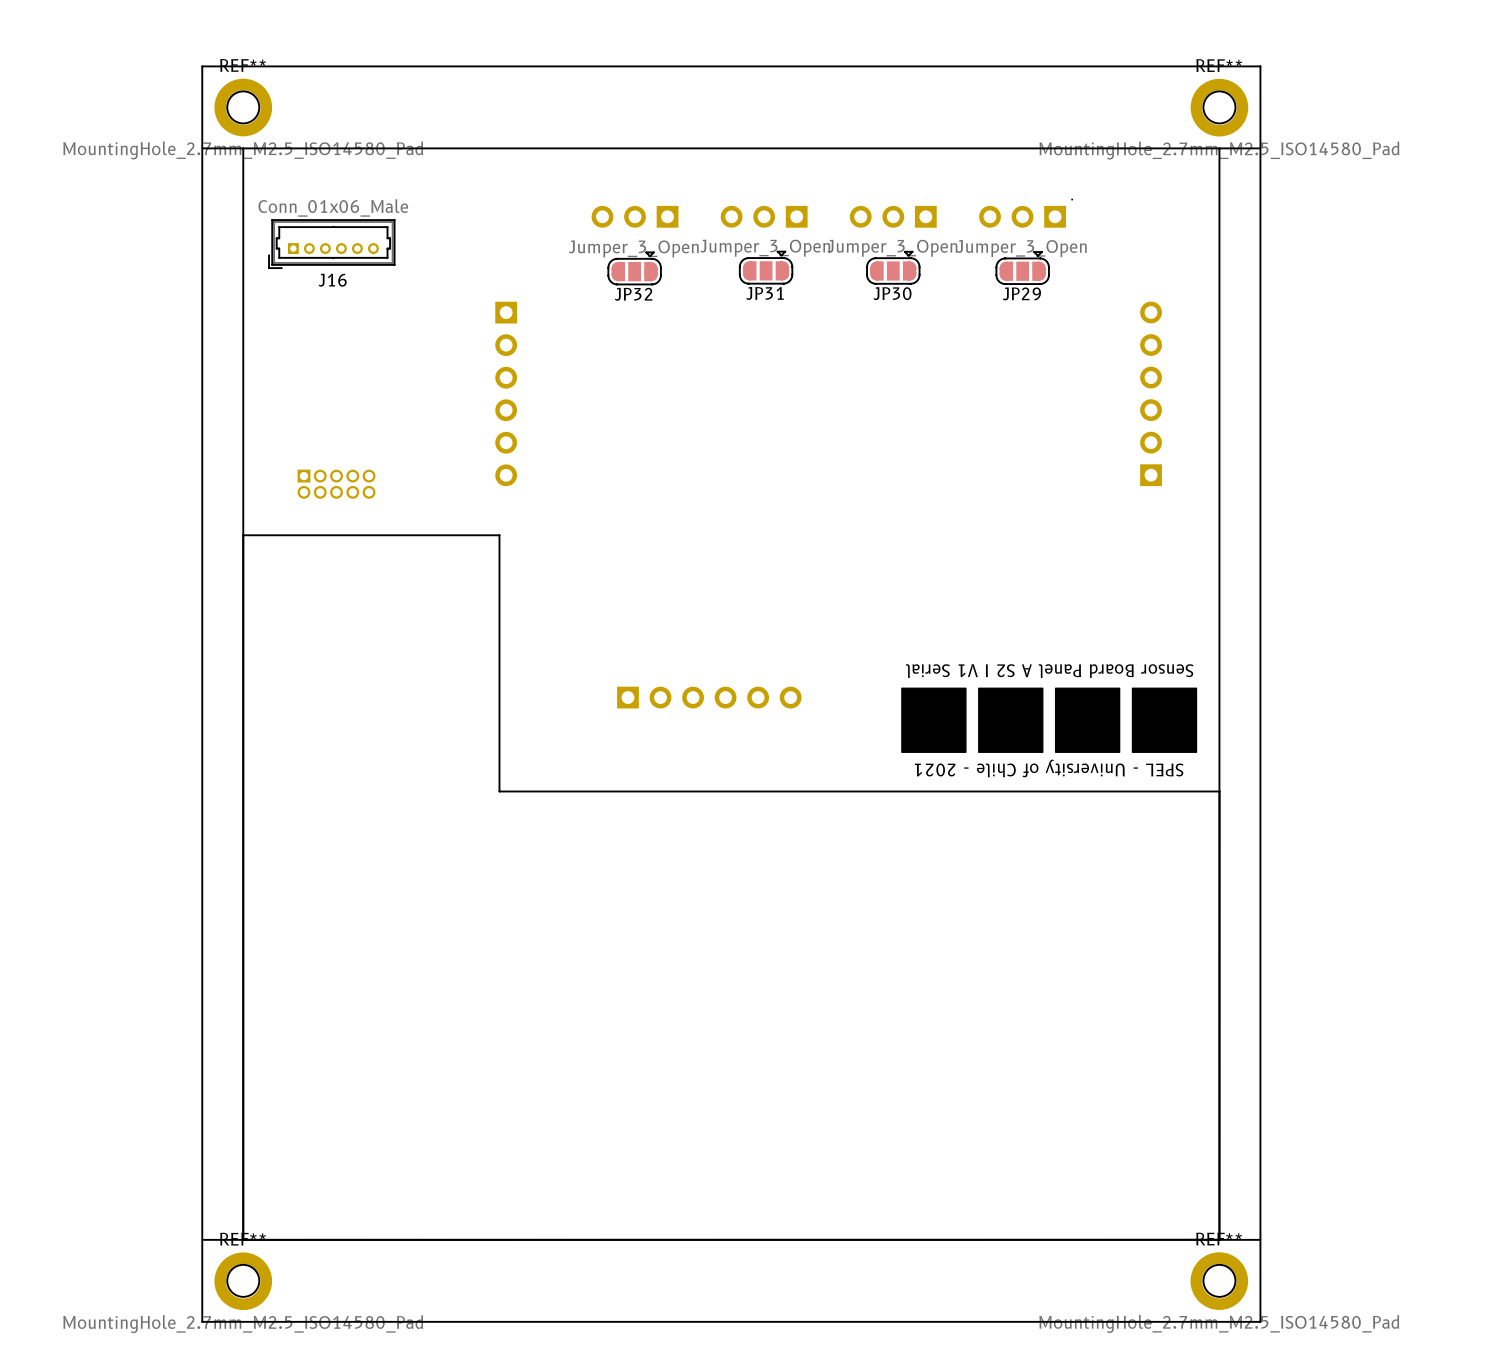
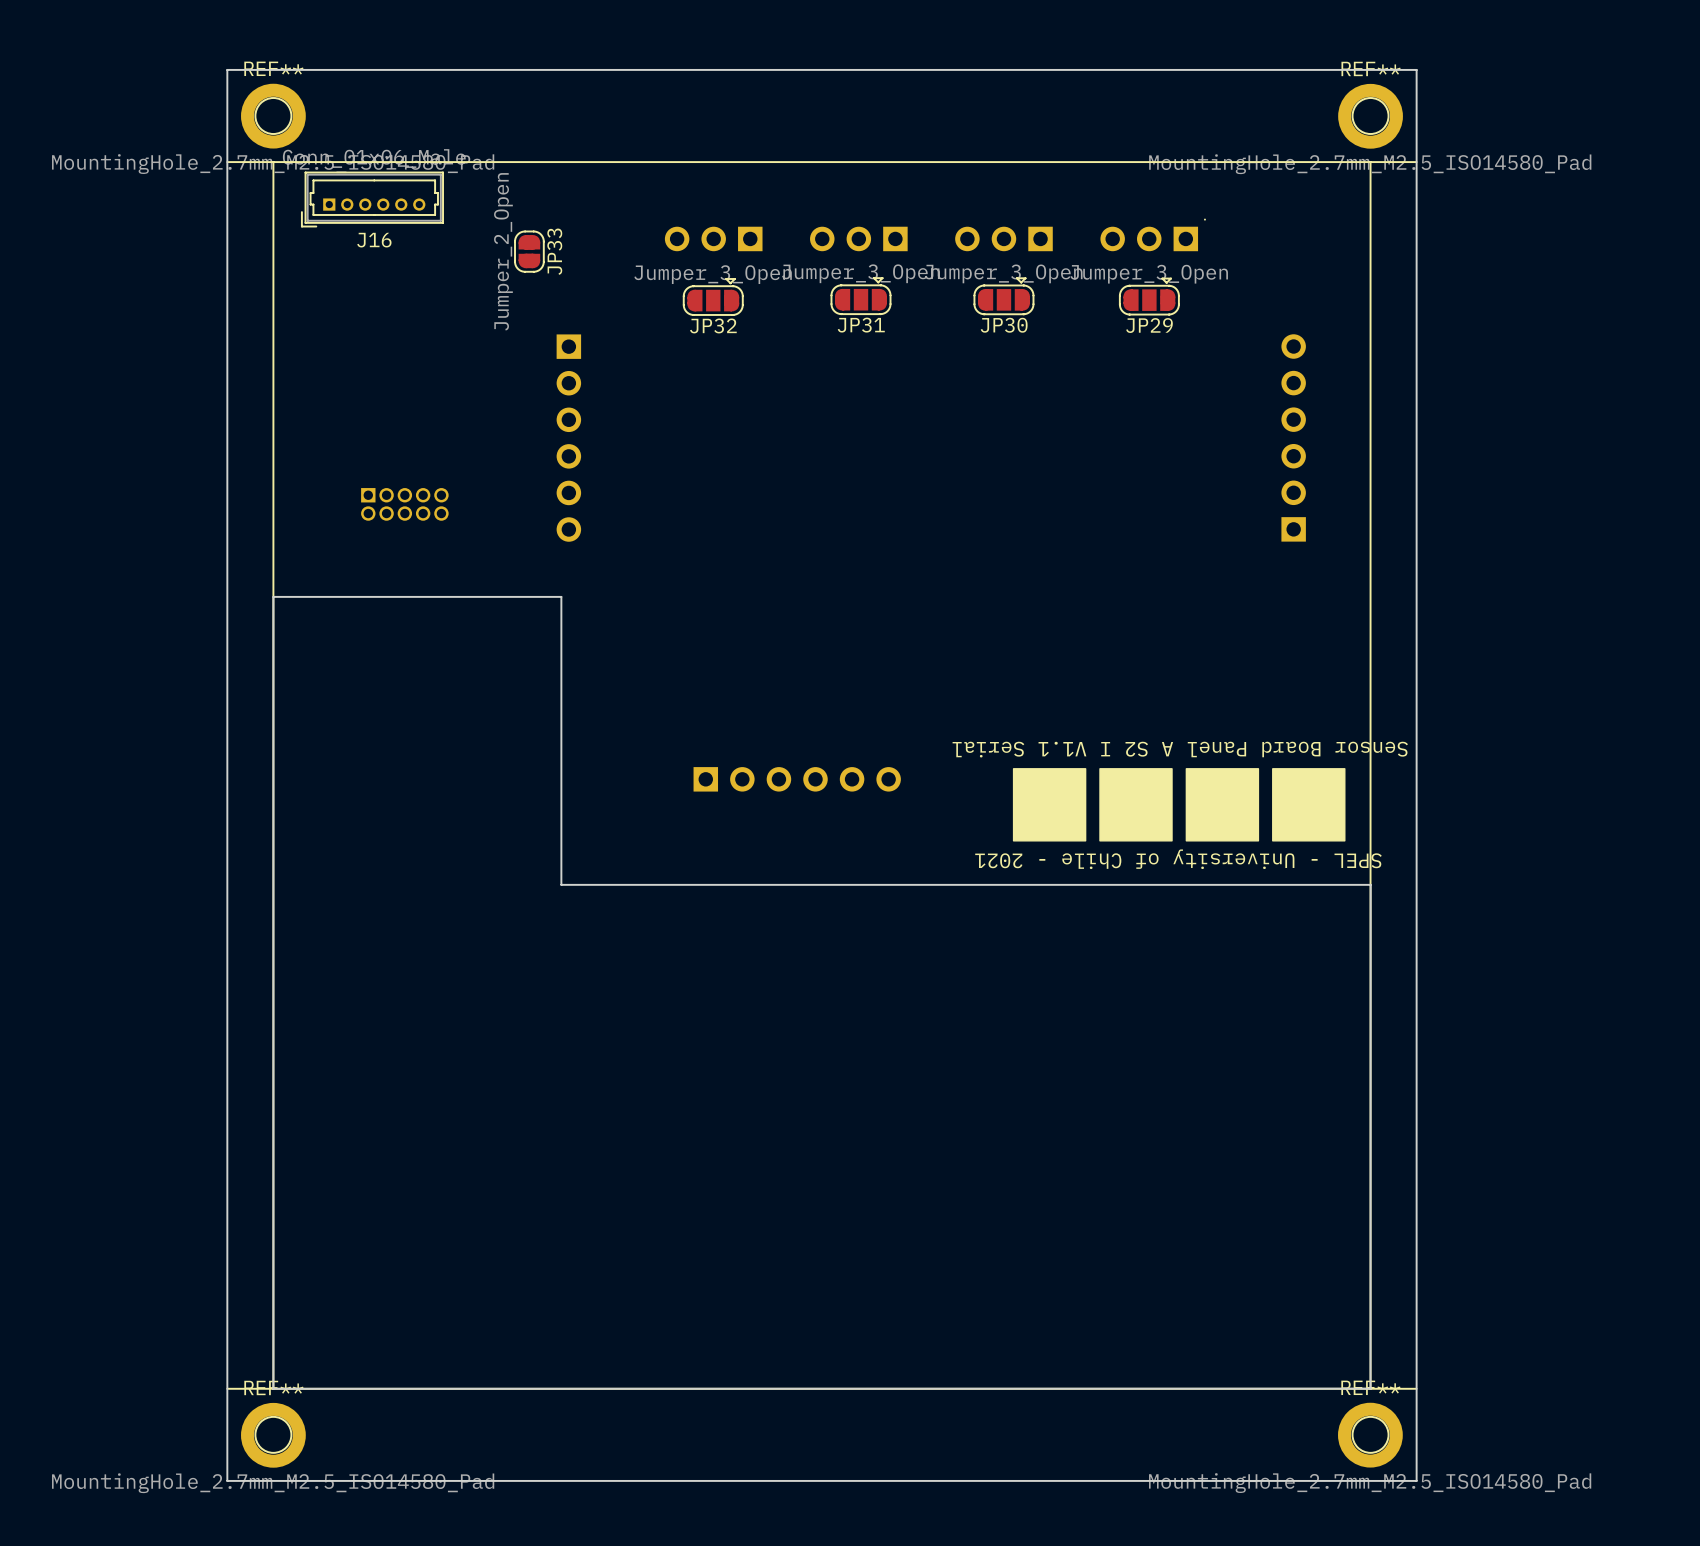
JP33: none -> Jumper_2_Open (529, 251)
J16 position: (331, 244) -> (372, 199)
part position: (336, 484) -> (404, 504)
text: Sensor Board Panel A S2 I V1 Serial (1049, 671) -> Sensor Board Panel A S2 I V1.1 Serial (1180, 749)

